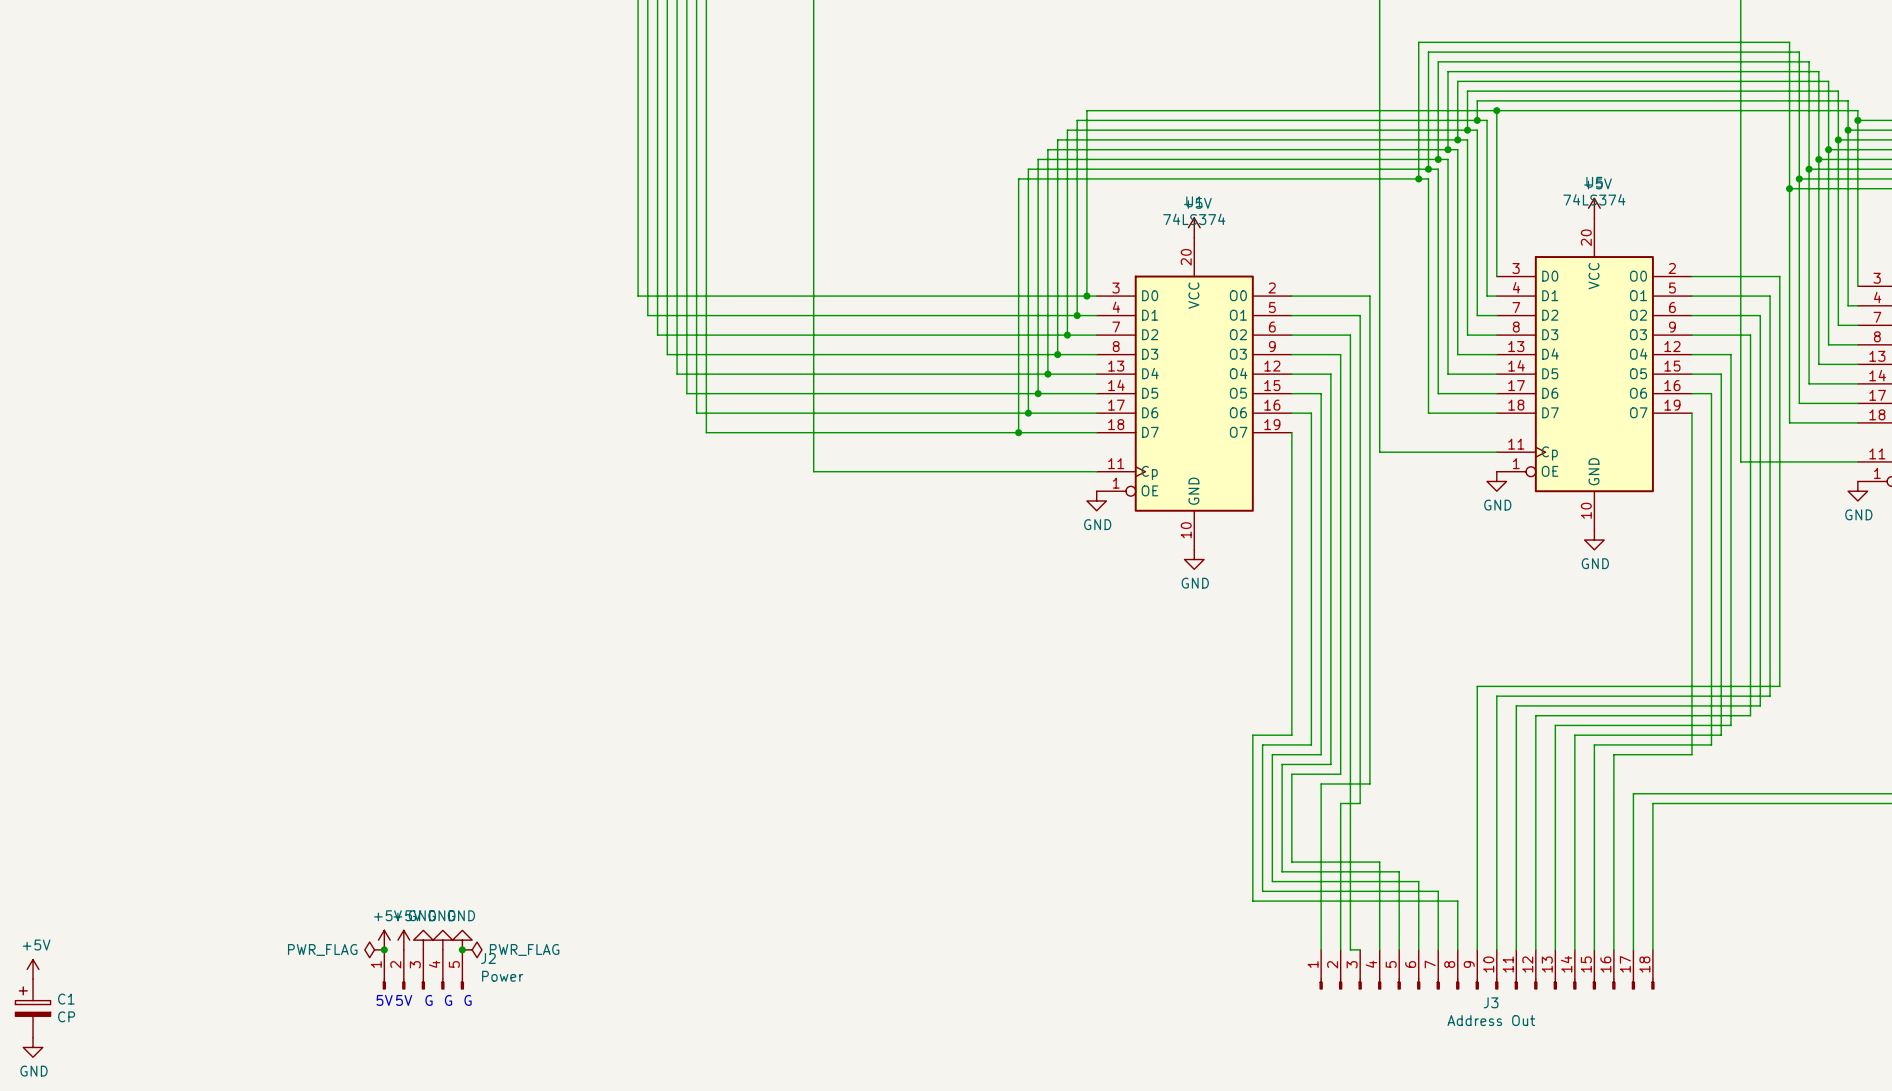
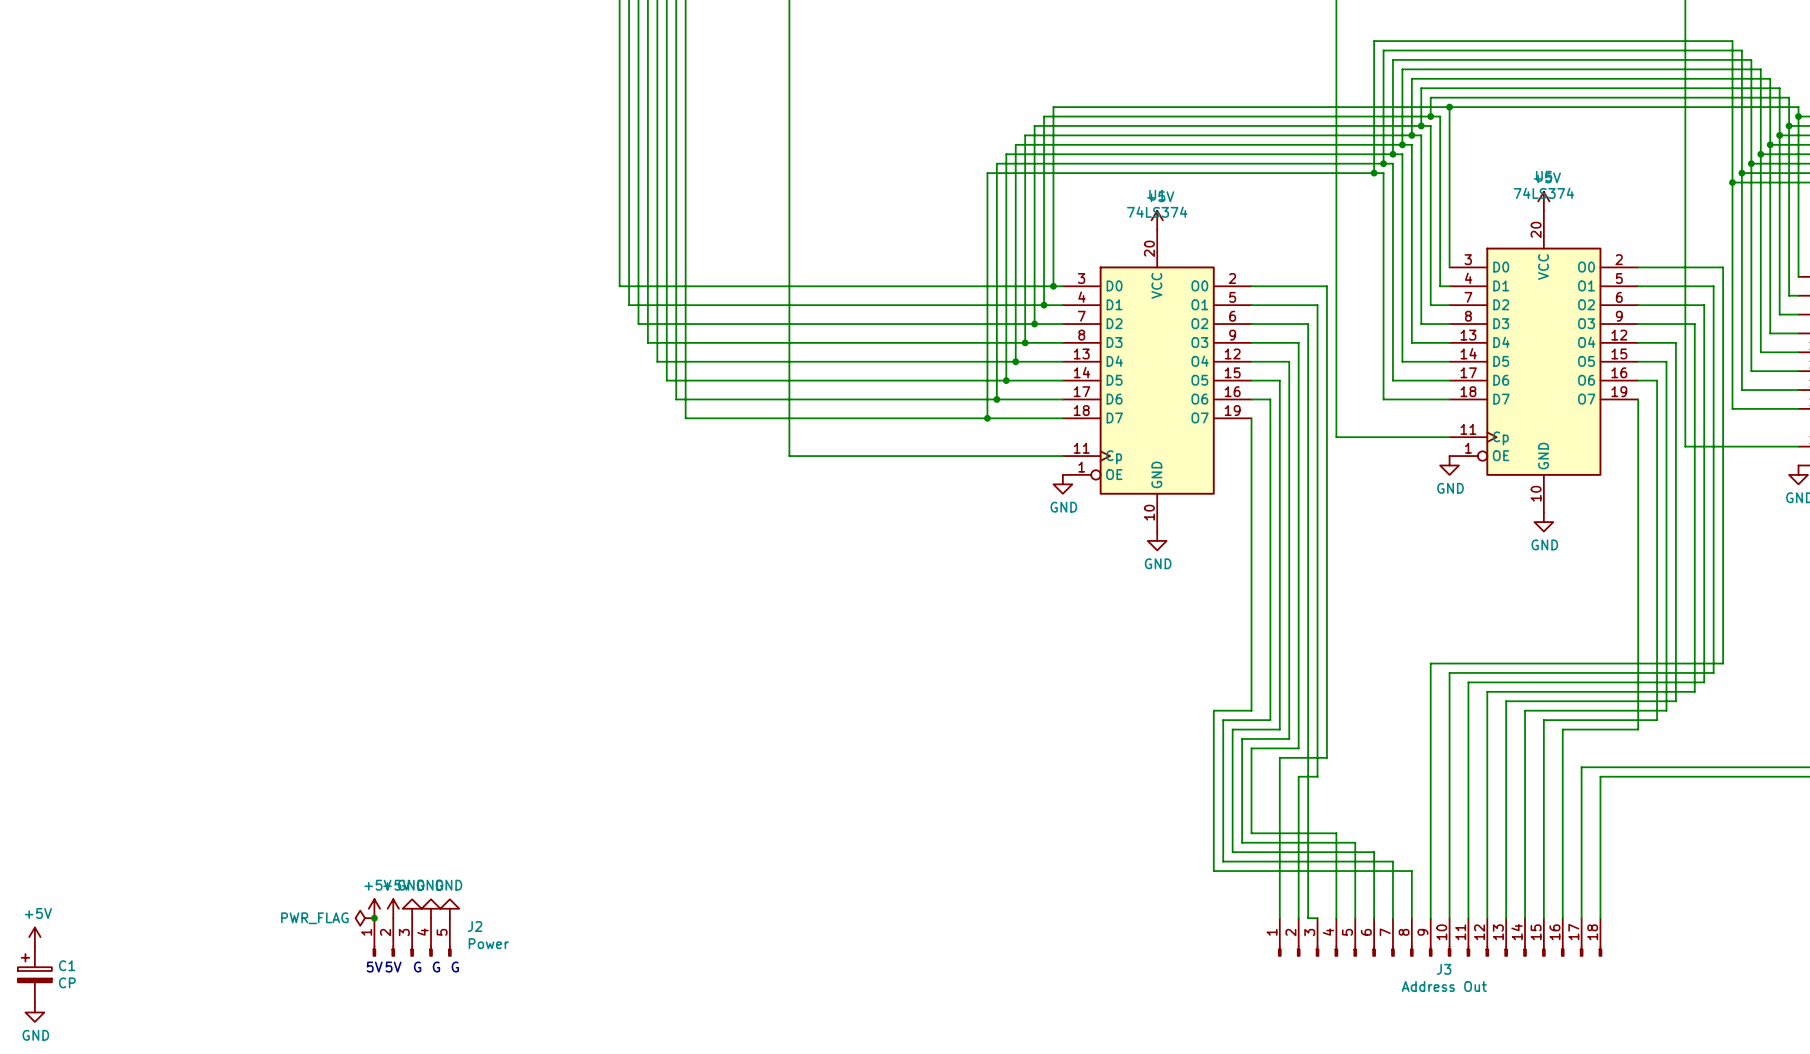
junction: (462, 949) -> none
power symbol: PWR_FLAG (472, 949) -> none

